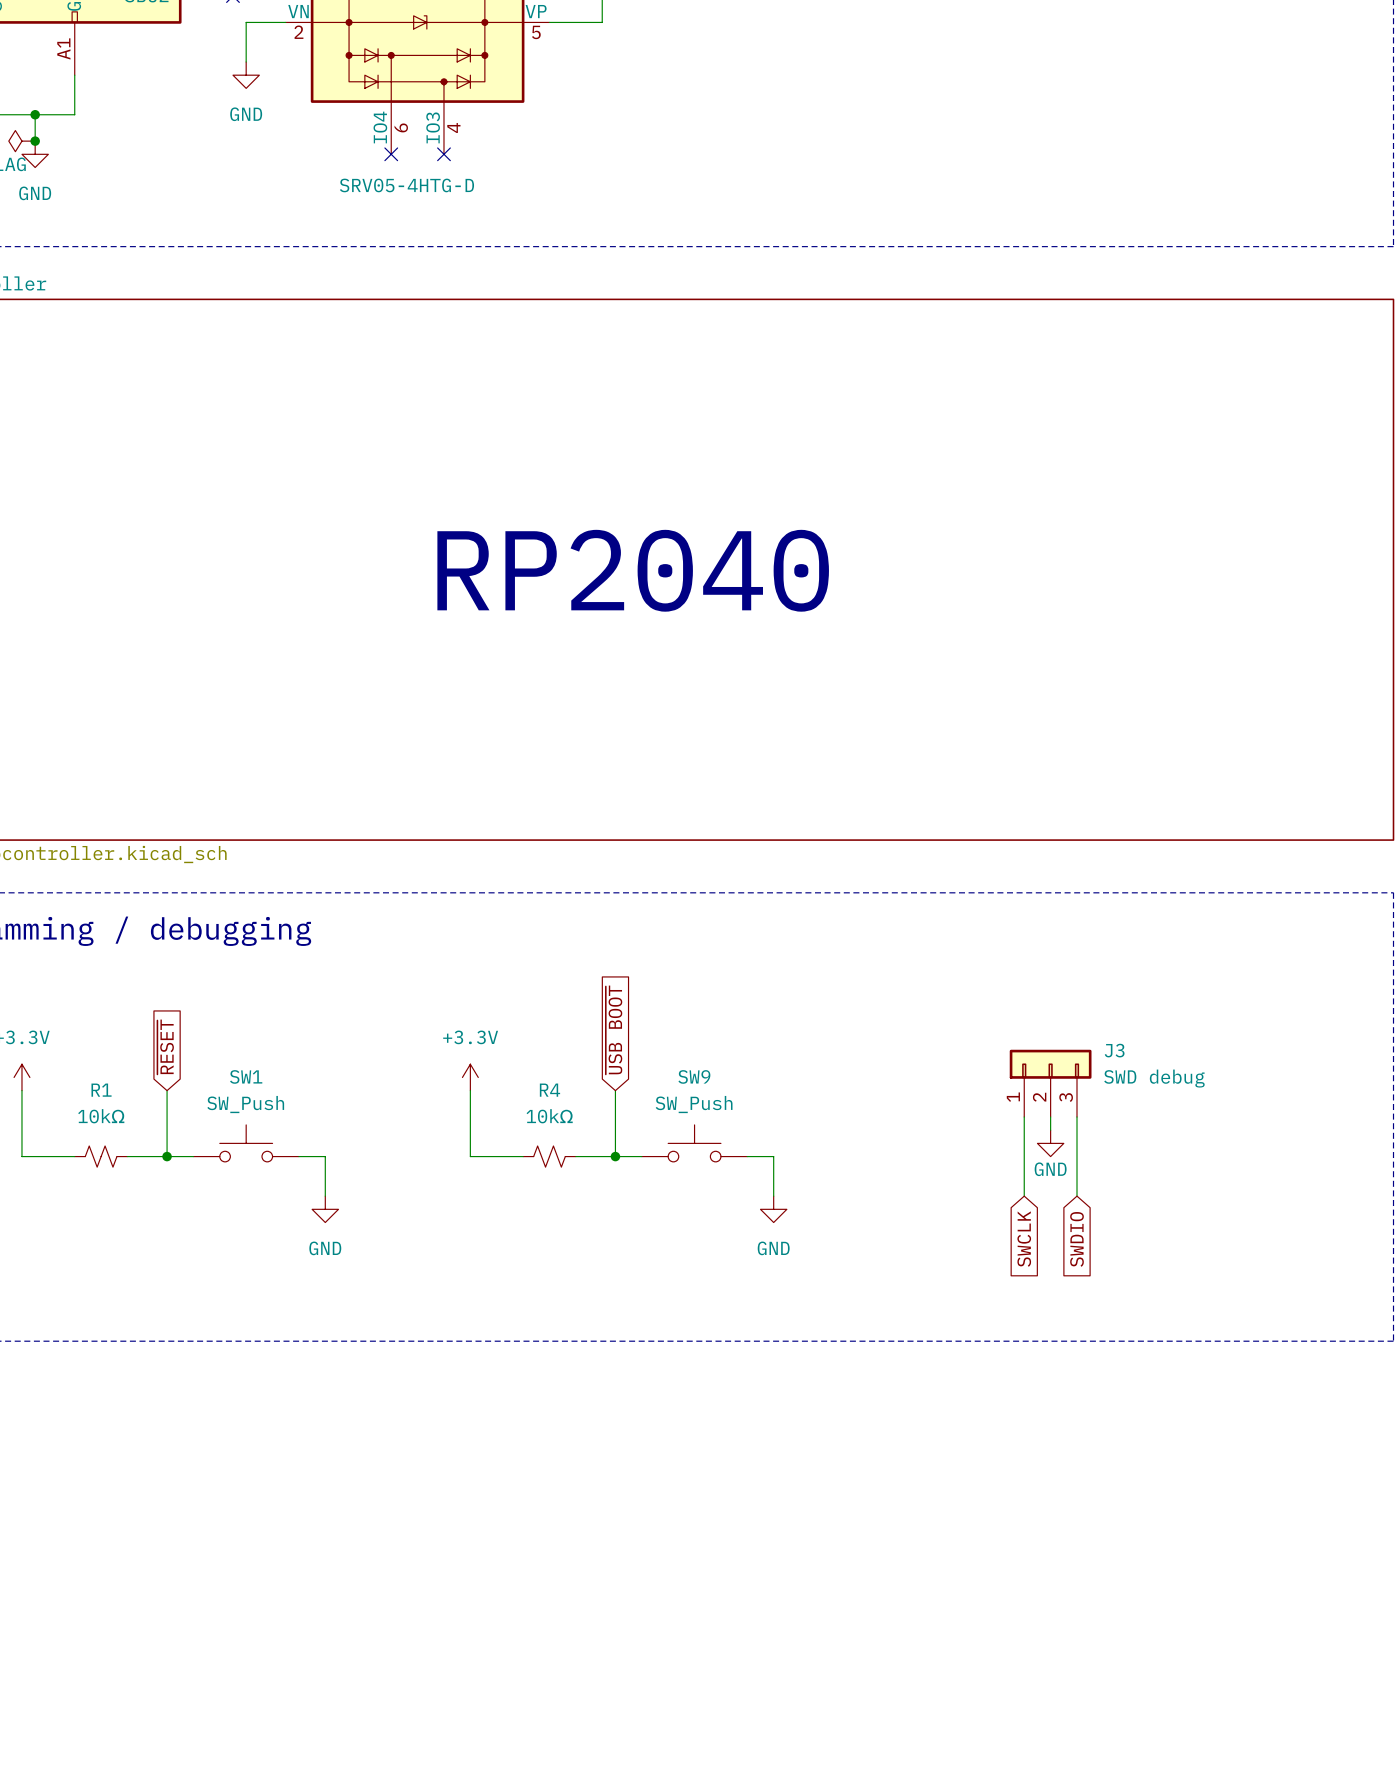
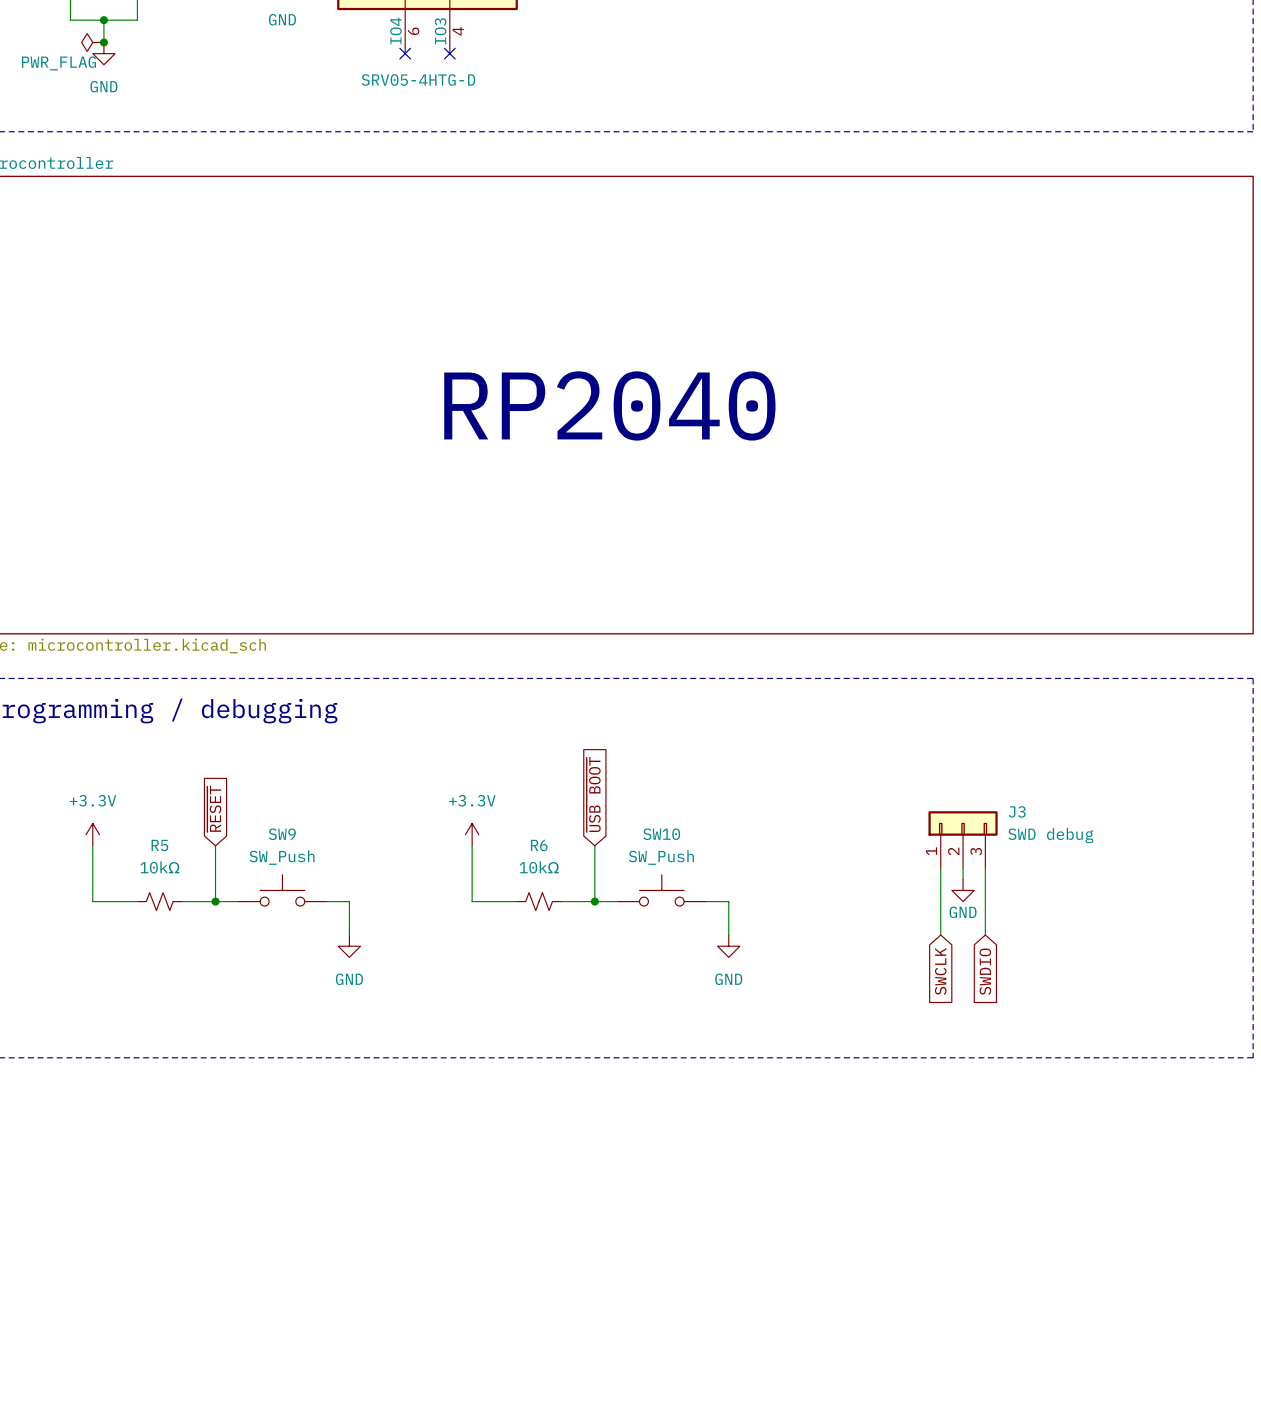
SW1 name: SW1 (246, 1076) -> SW9 (282, 834)
SW9 name: SW9 (694, 1076) -> SW10 (661, 834)
R1 name: R1 (101, 1090) -> R5 (159, 845)
R4 name: R4 (549, 1090) -> R6 (539, 845)

